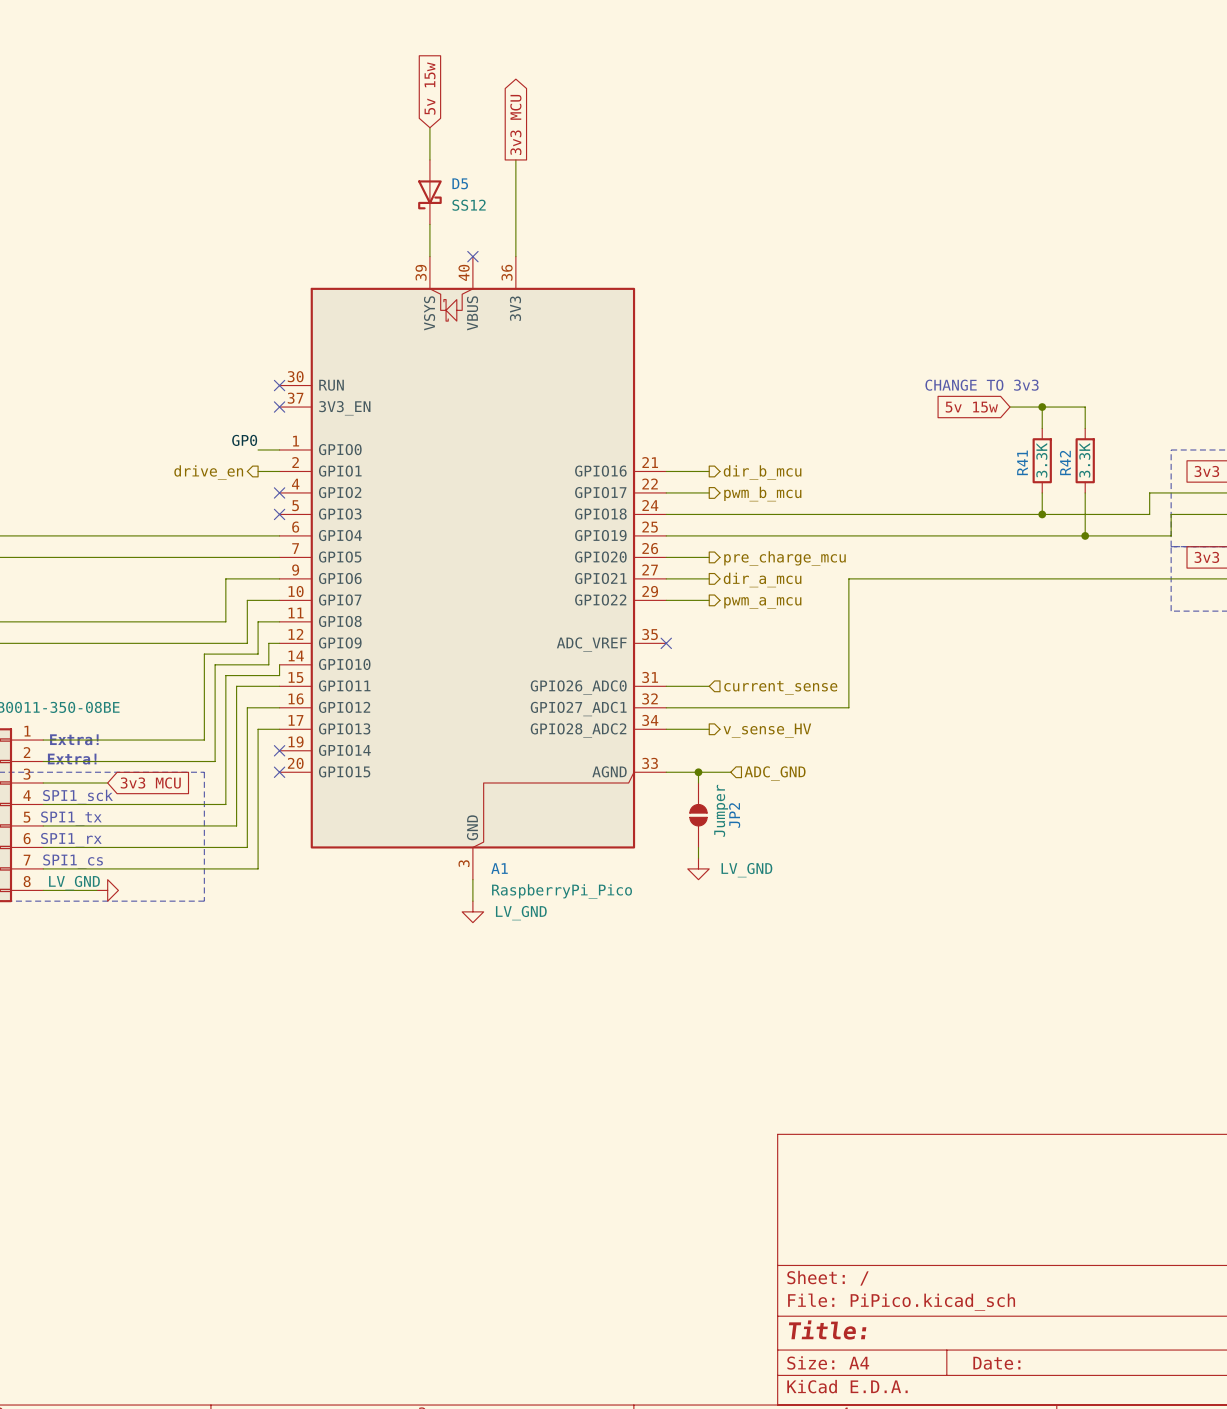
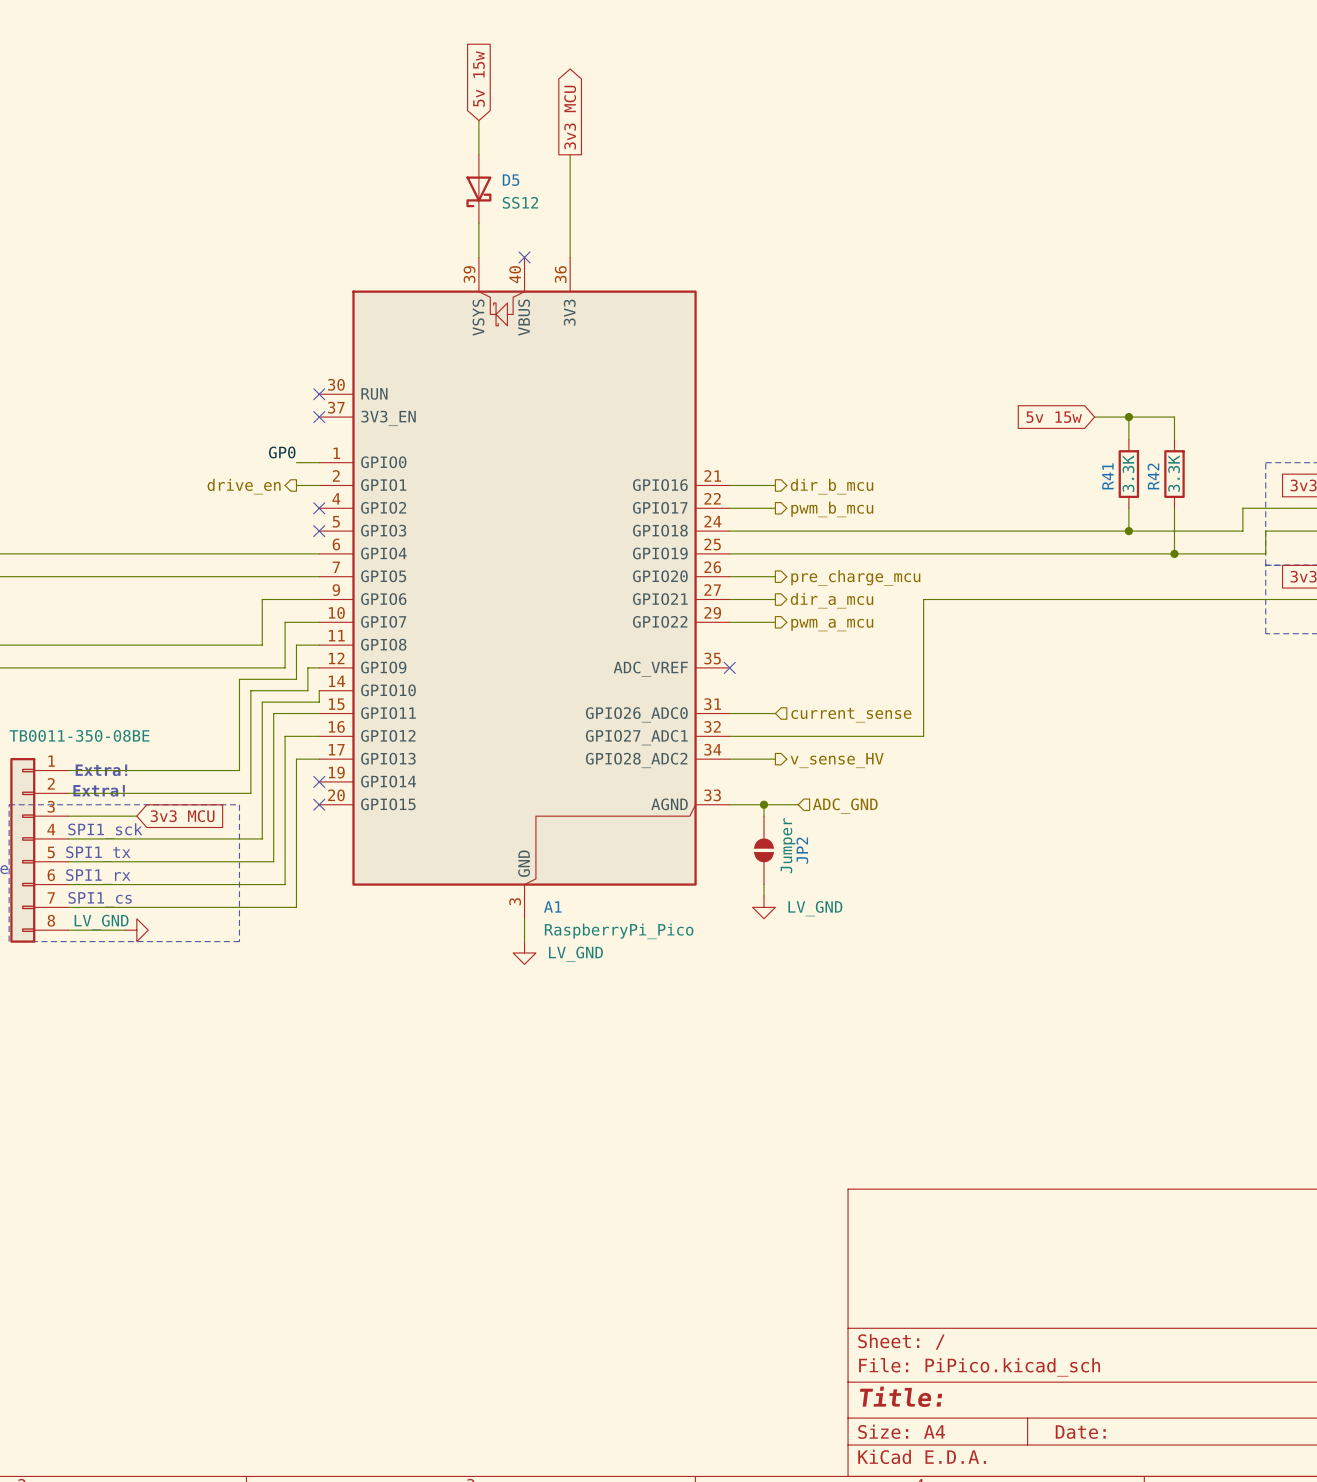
text: CHANGE TO 3v3 (982, 385) -> none

